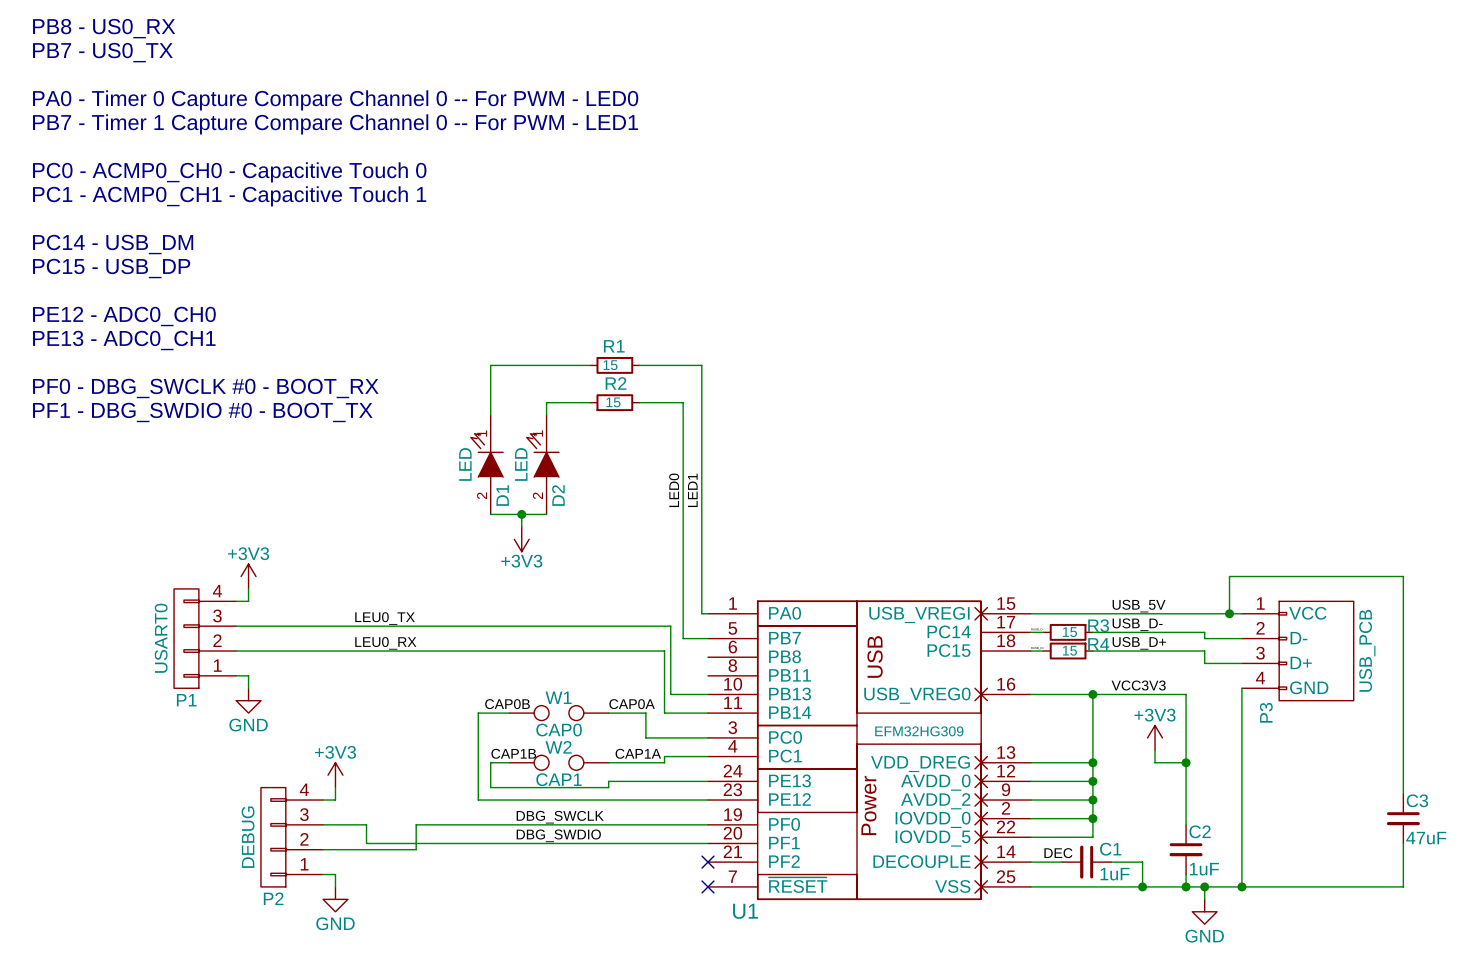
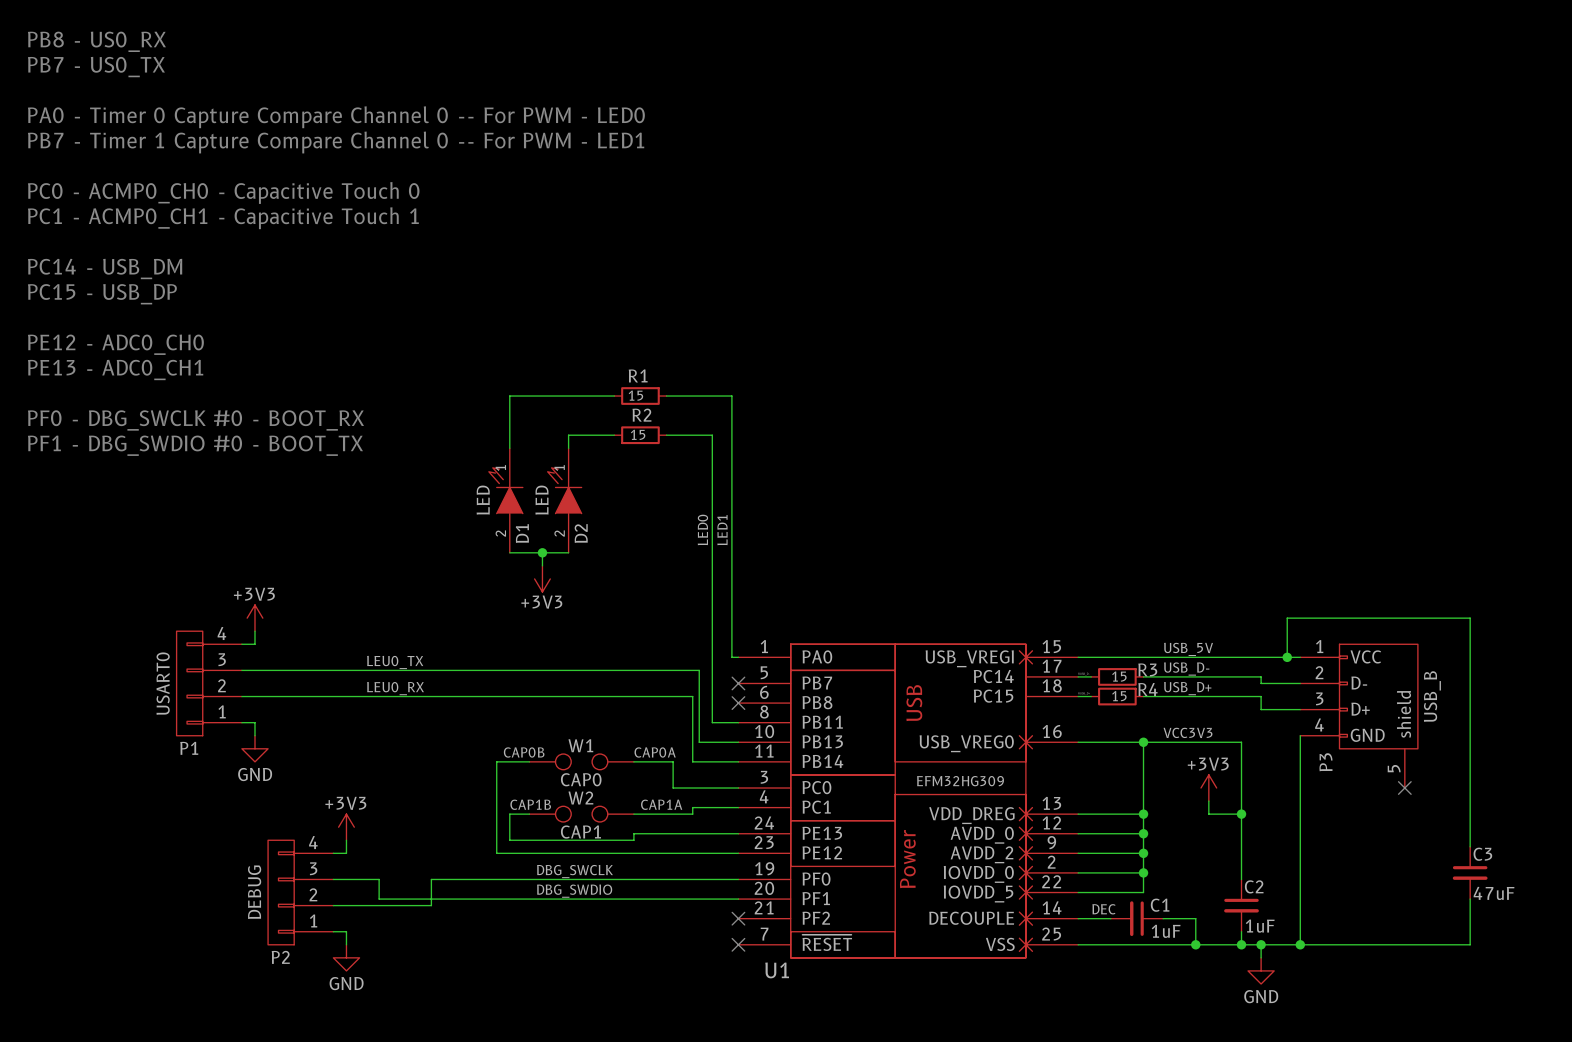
P3 symbol: [1241, 601, 1354, 701] -> [1300, 644, 1418, 789]
wire: (683, 638) (707, 638) -> (712, 683) (712, 722) (738, 722)
no-connect mark: none -> (738, 683)
P3 value: USB_PCB (1367, 650) -> USB_B (1432, 696)
no-connect mark: none -> (738, 703)
no-connect mark: none -> (1404, 788)

